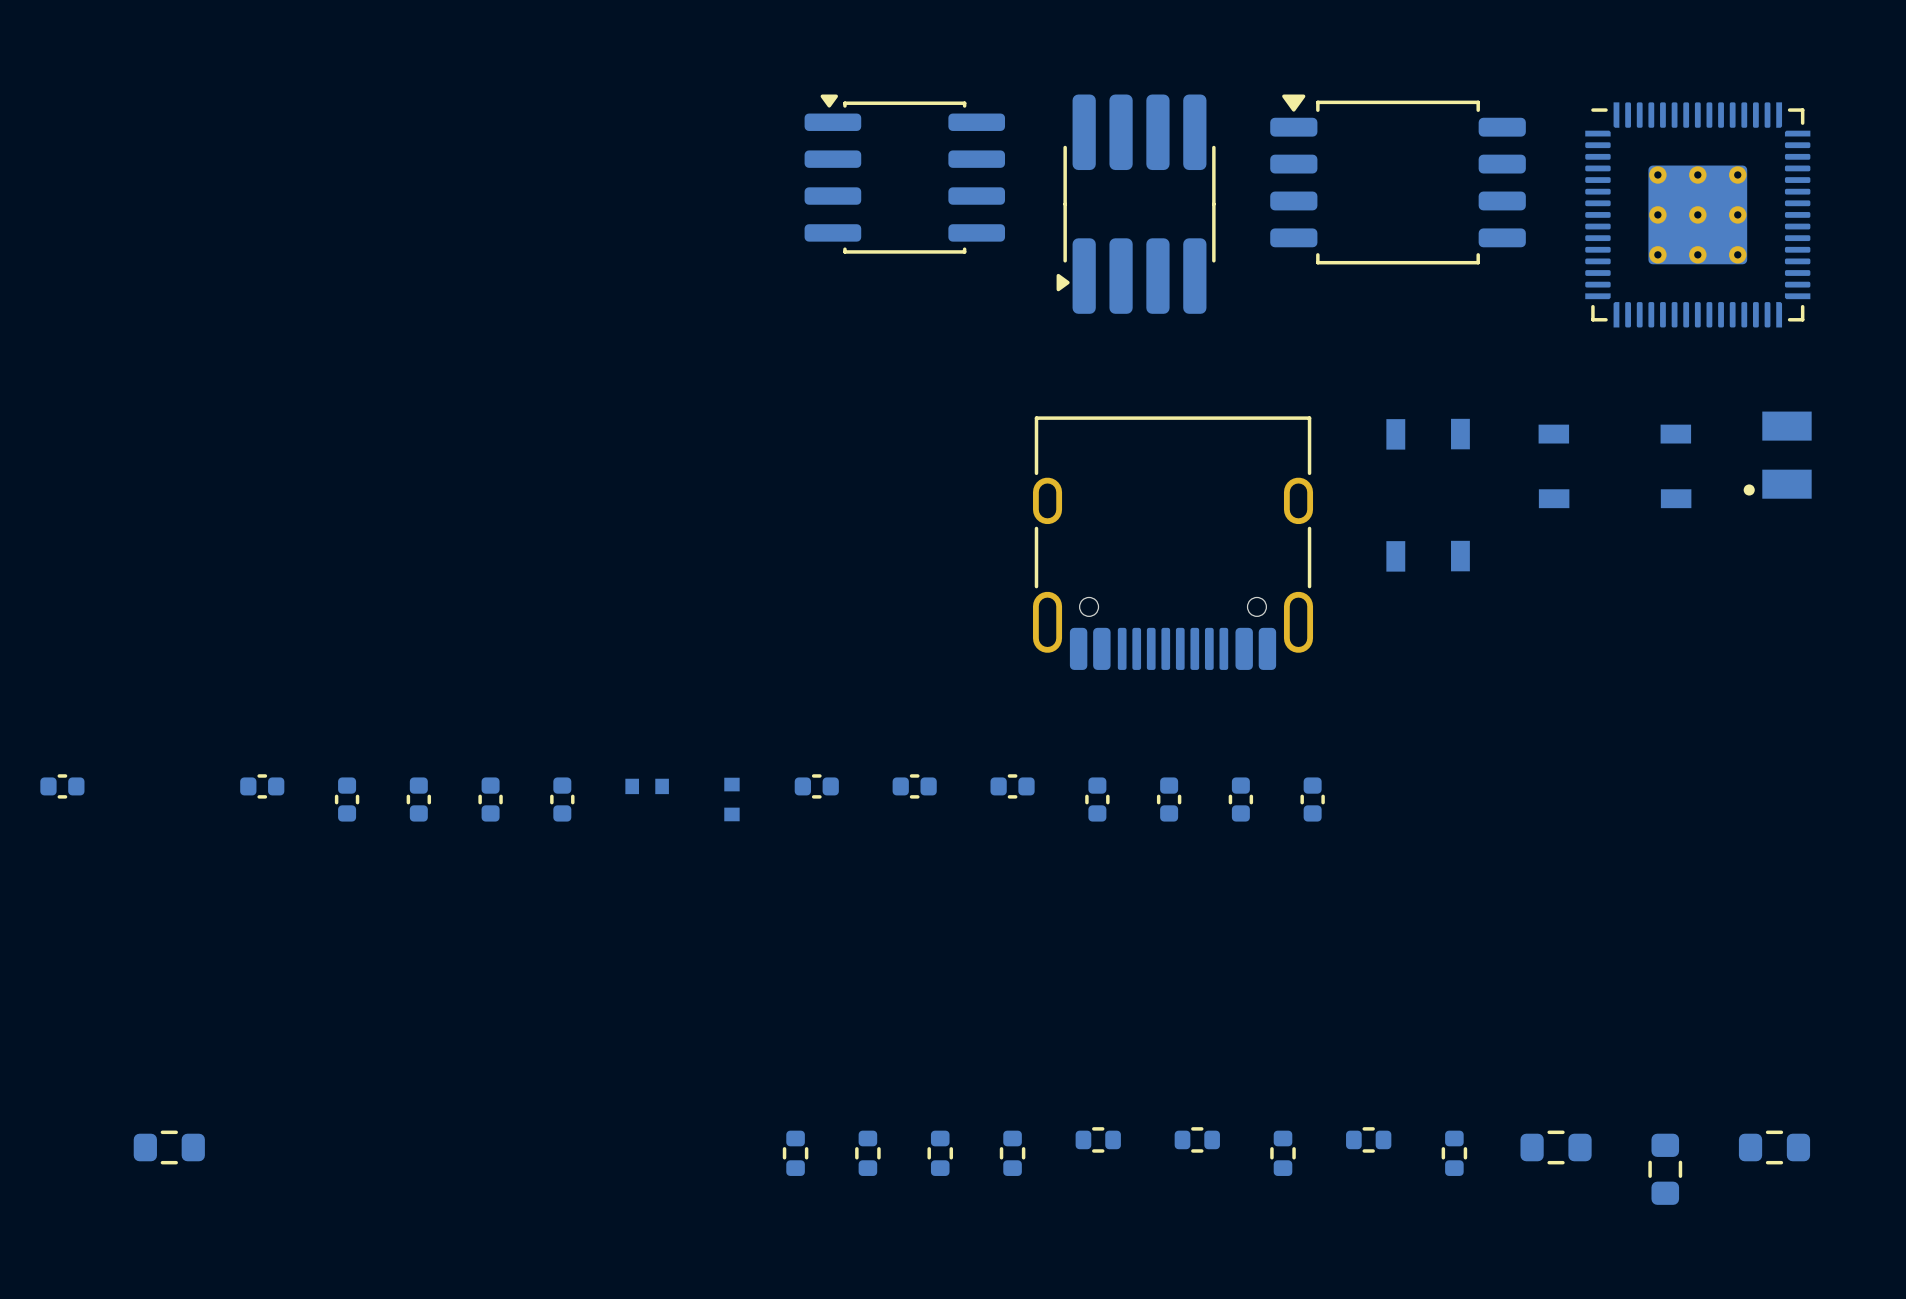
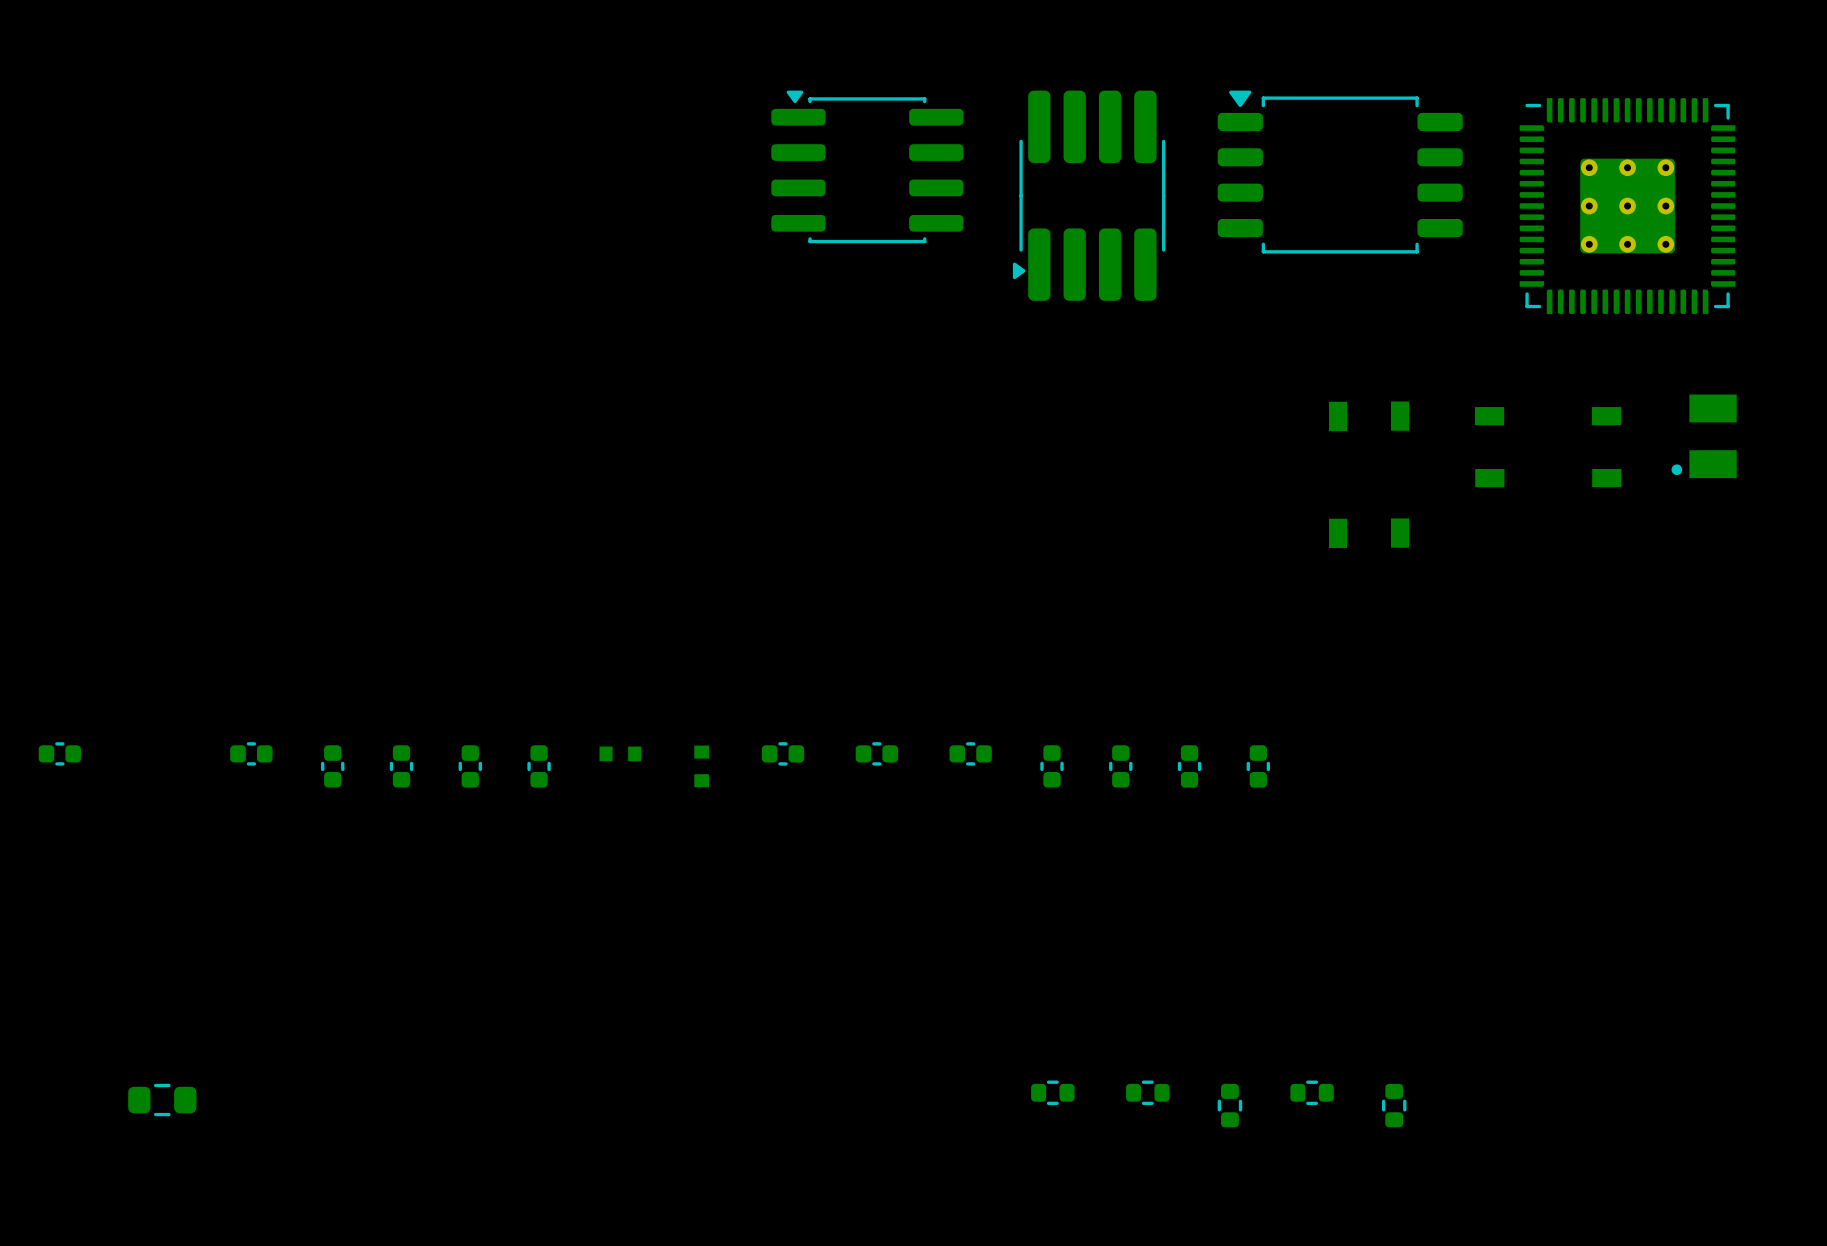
part: (1173, 543) -> none
part: (1556, 1147) -> none
part: (1774, 1147) -> none
part: (795, 1153) -> none
part: (867, 1153) -> none
part: (940, 1153) -> none
part: (1012, 1153) -> none
part: (1665, 1169) -> none

